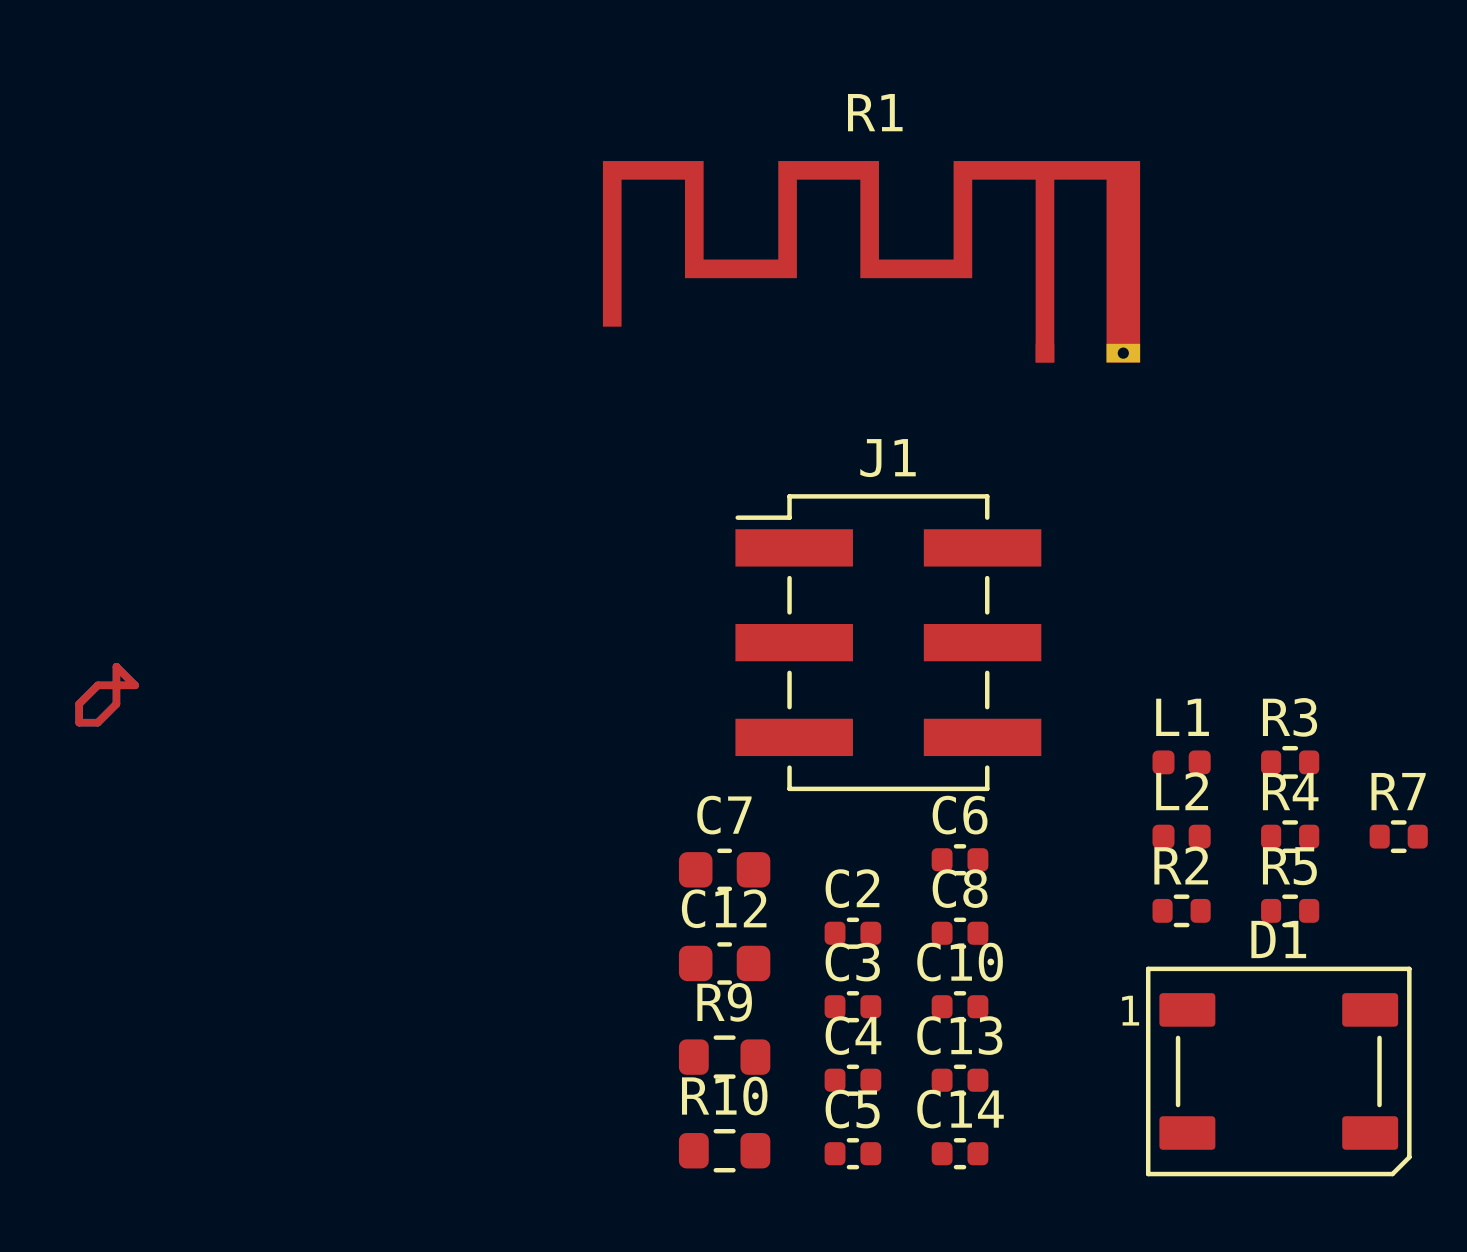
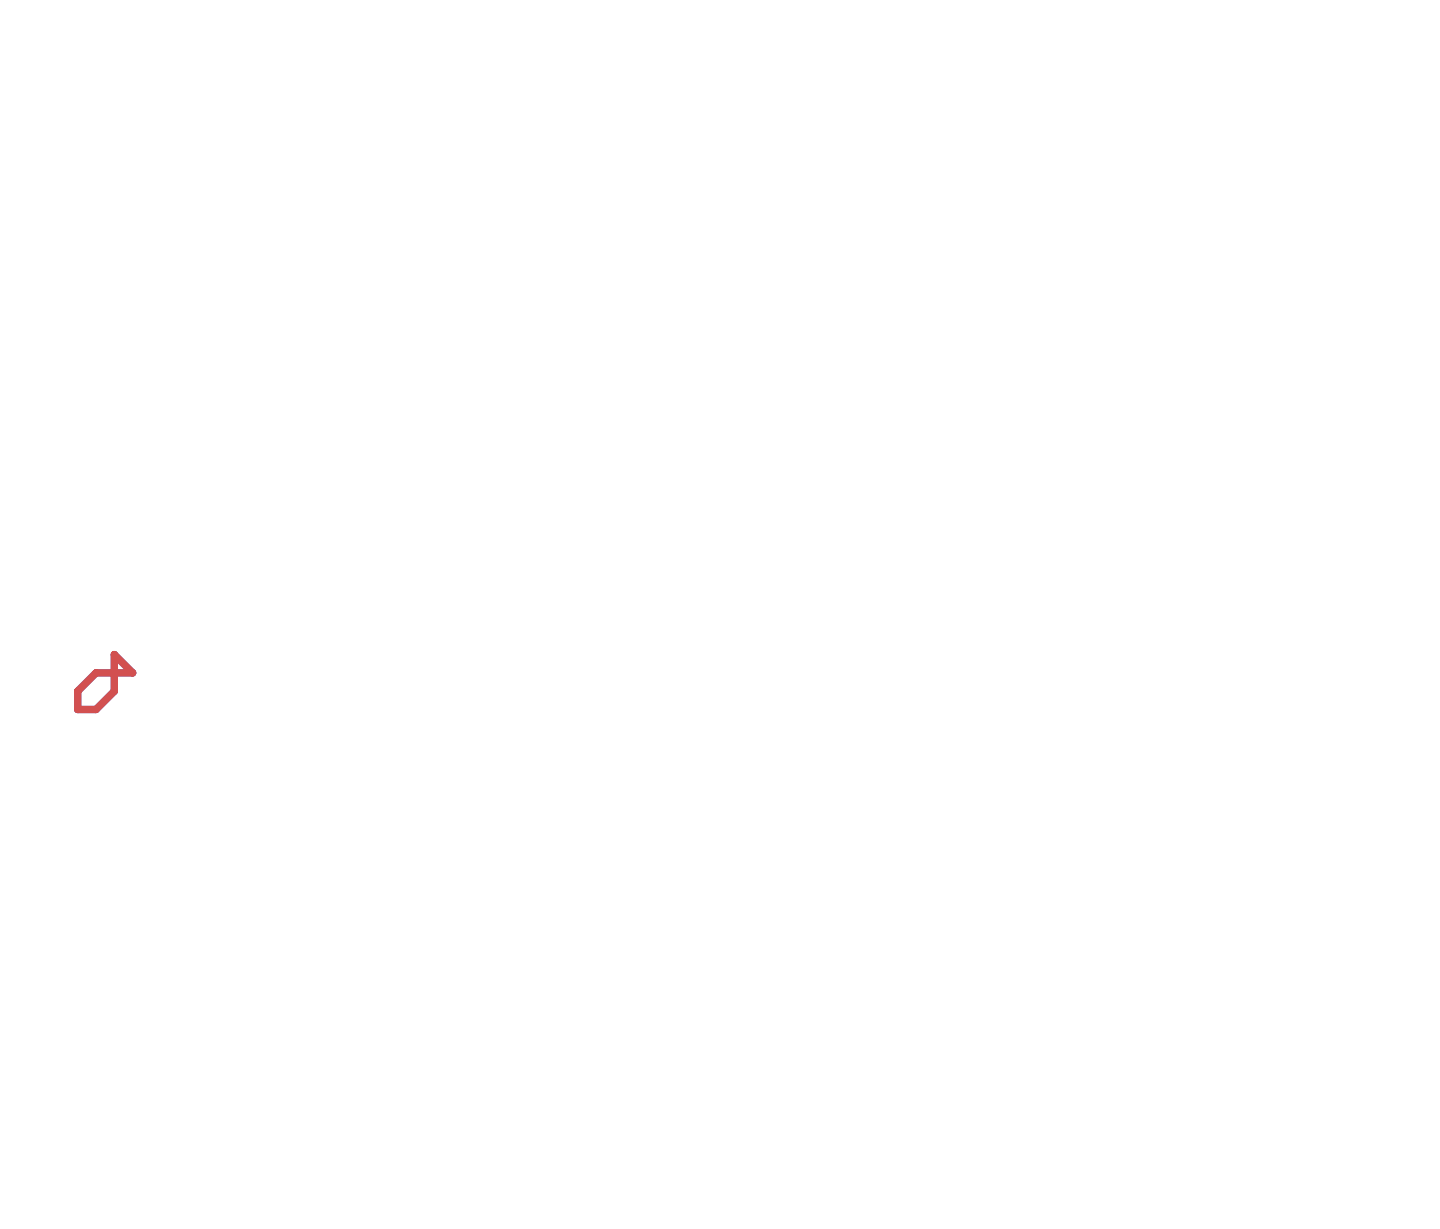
R1: (871, 261) -> none
J1: (888, 642) -> none
L1: (1181, 762) -> none
R3: (1290, 762) -> none
L2: (1181, 836) -> none
R4: (1290, 836) -> none
R7: (1398, 836) -> none
C6: (960, 859) -> none
C7: (724, 869) -> none
R2: (1181, 910) -> none
R5: (1290, 910) -> none
C2: (852, 933) -> none
C8: (960, 933) -> none
C12: (724, 963) -> none
C3: (852, 1006) -> none
C10: (960, 1006) -> none
R9: (724, 1057) -> none
D1: (1278, 1071) -> none
C4: (852, 1080) -> none
C13: (960, 1080) -> none
R10: (724, 1150) -> none
C5: (852, 1153) -> none
C14: (960, 1153) -> none

